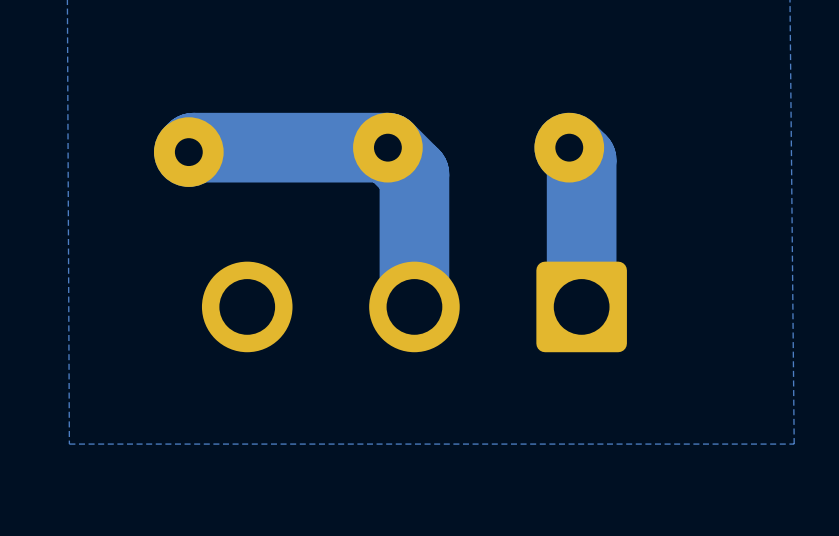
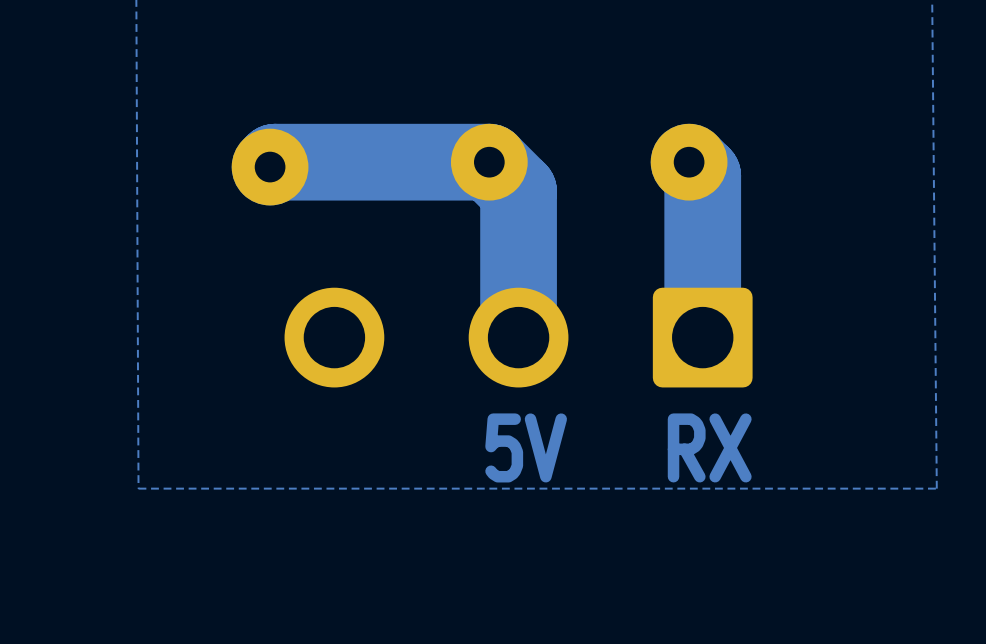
text: none -> 5V (526, 447)
text: none -> RX (709, 447)

